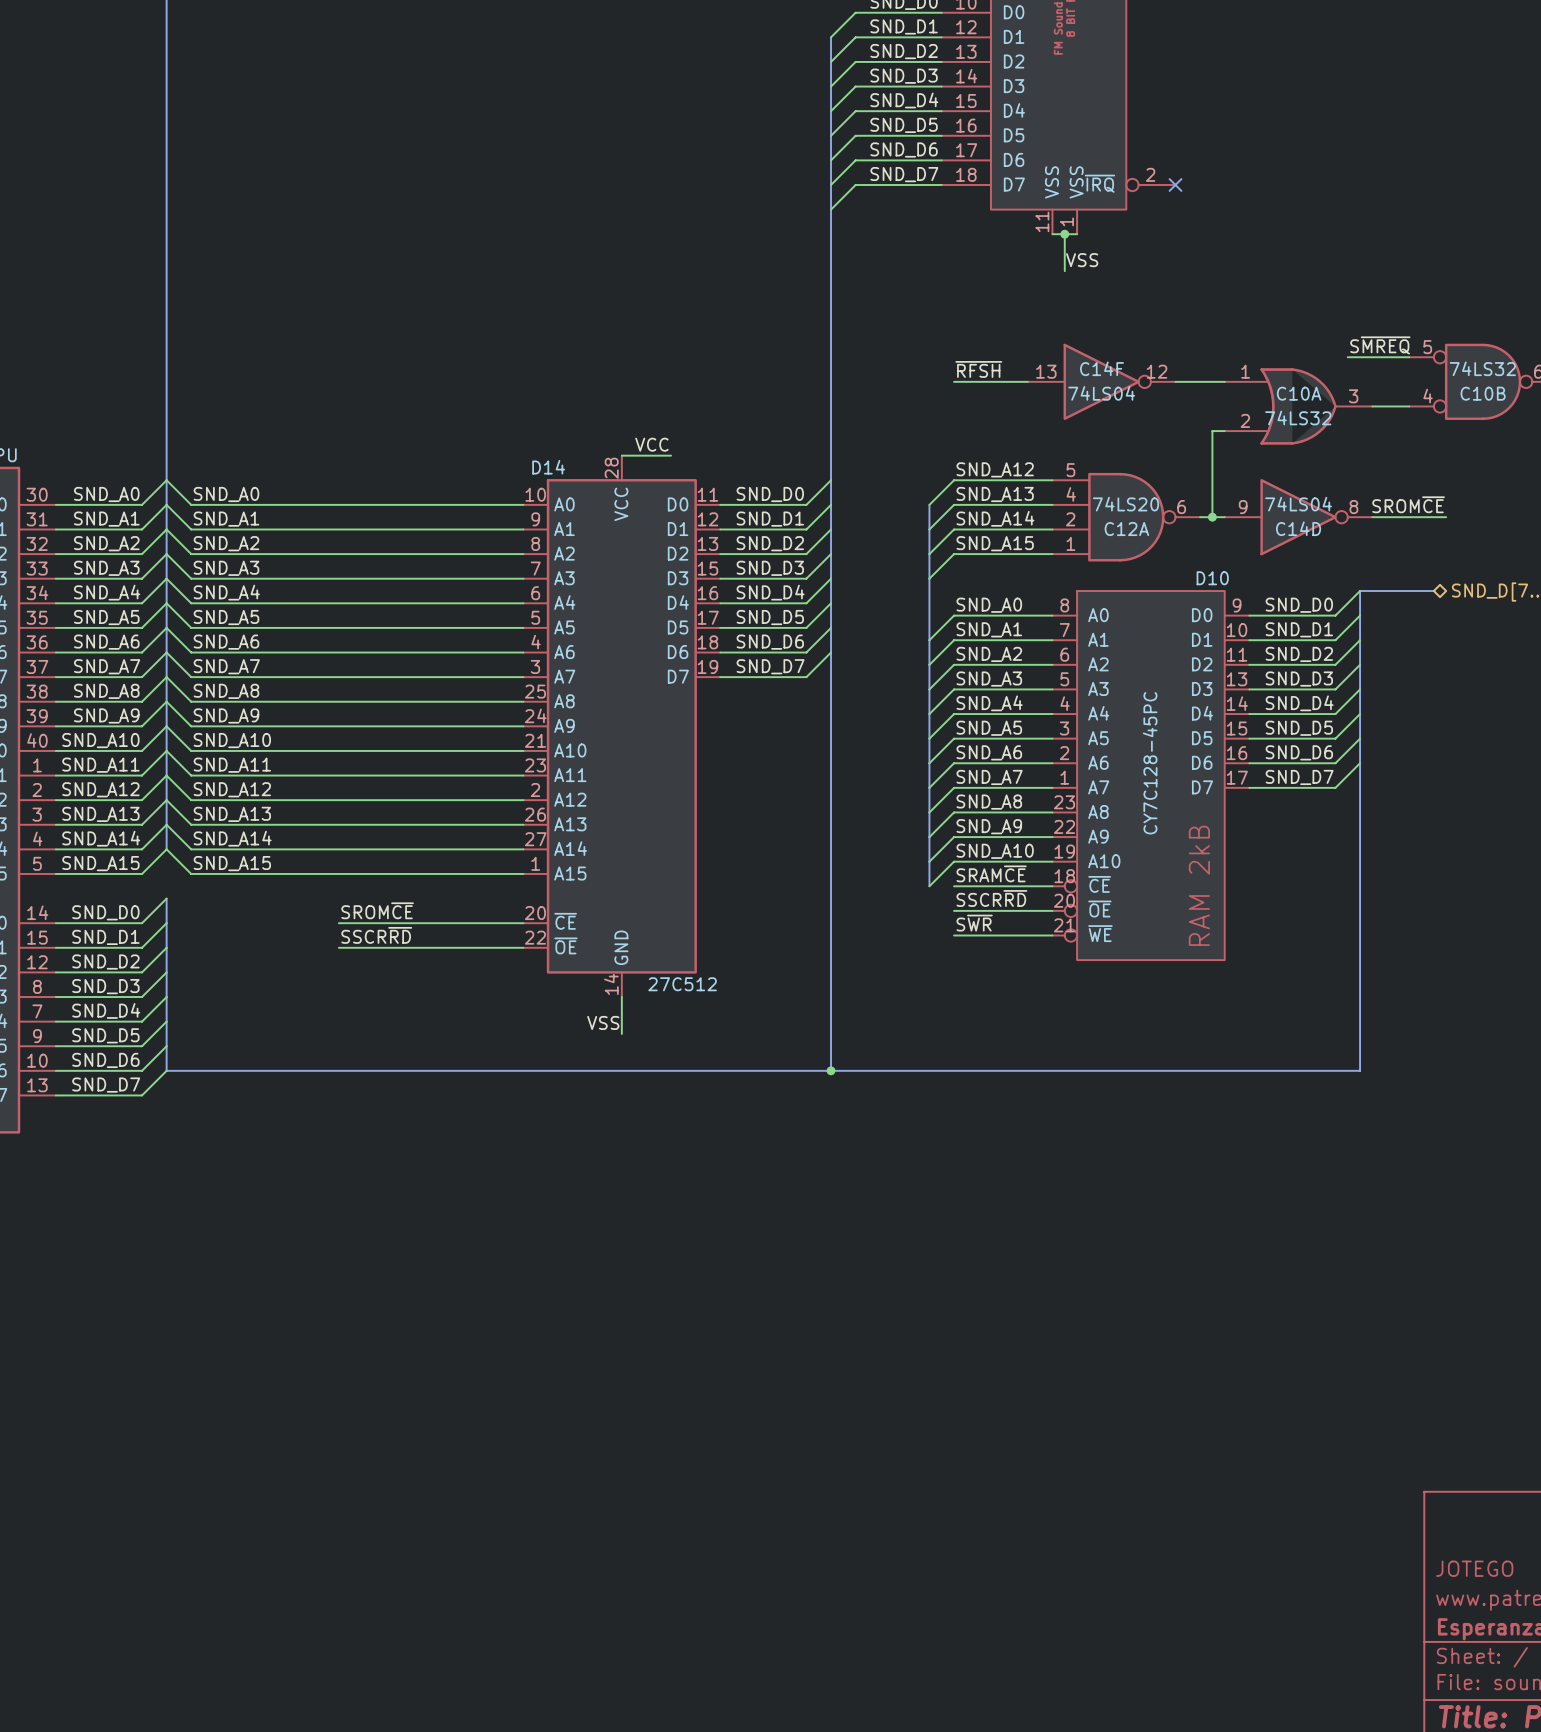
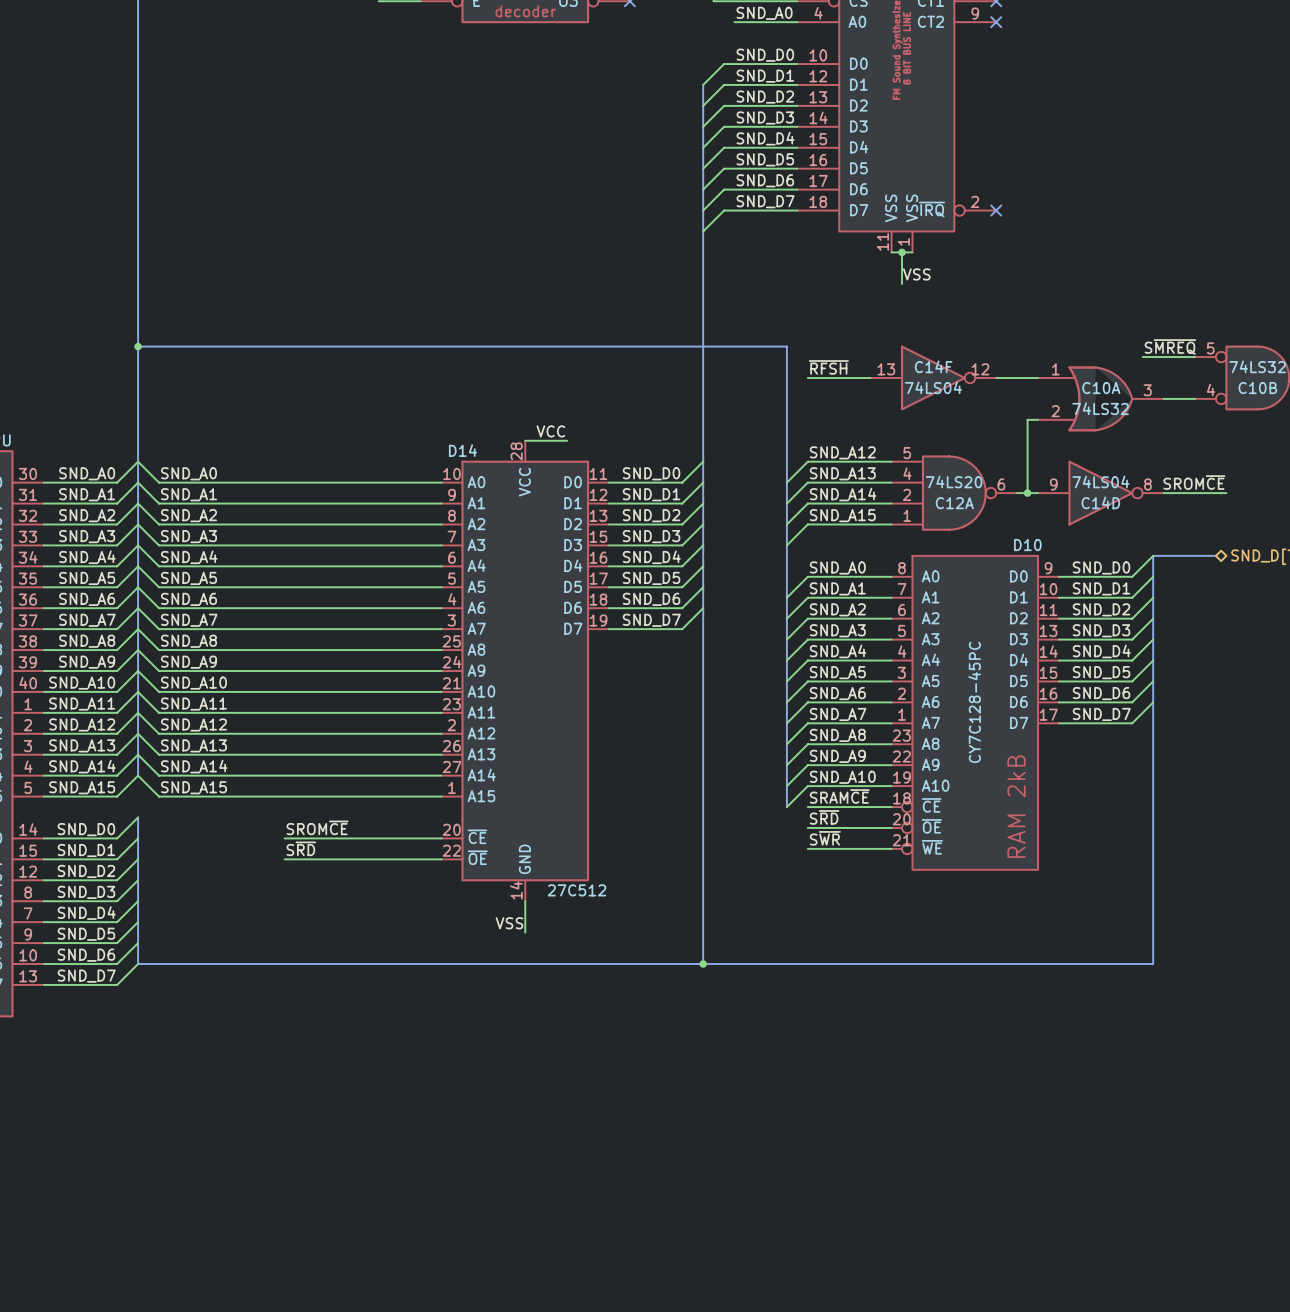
bus: none -> (138, 346) (786, 346) (786, 482)
junction: none -> (138, 346)
label: SSCR~{RD} (991, 898) -> S~{RD} (824, 817)
label: SSCR~{RD} (376, 935) -> S~{RD} (301, 848)

